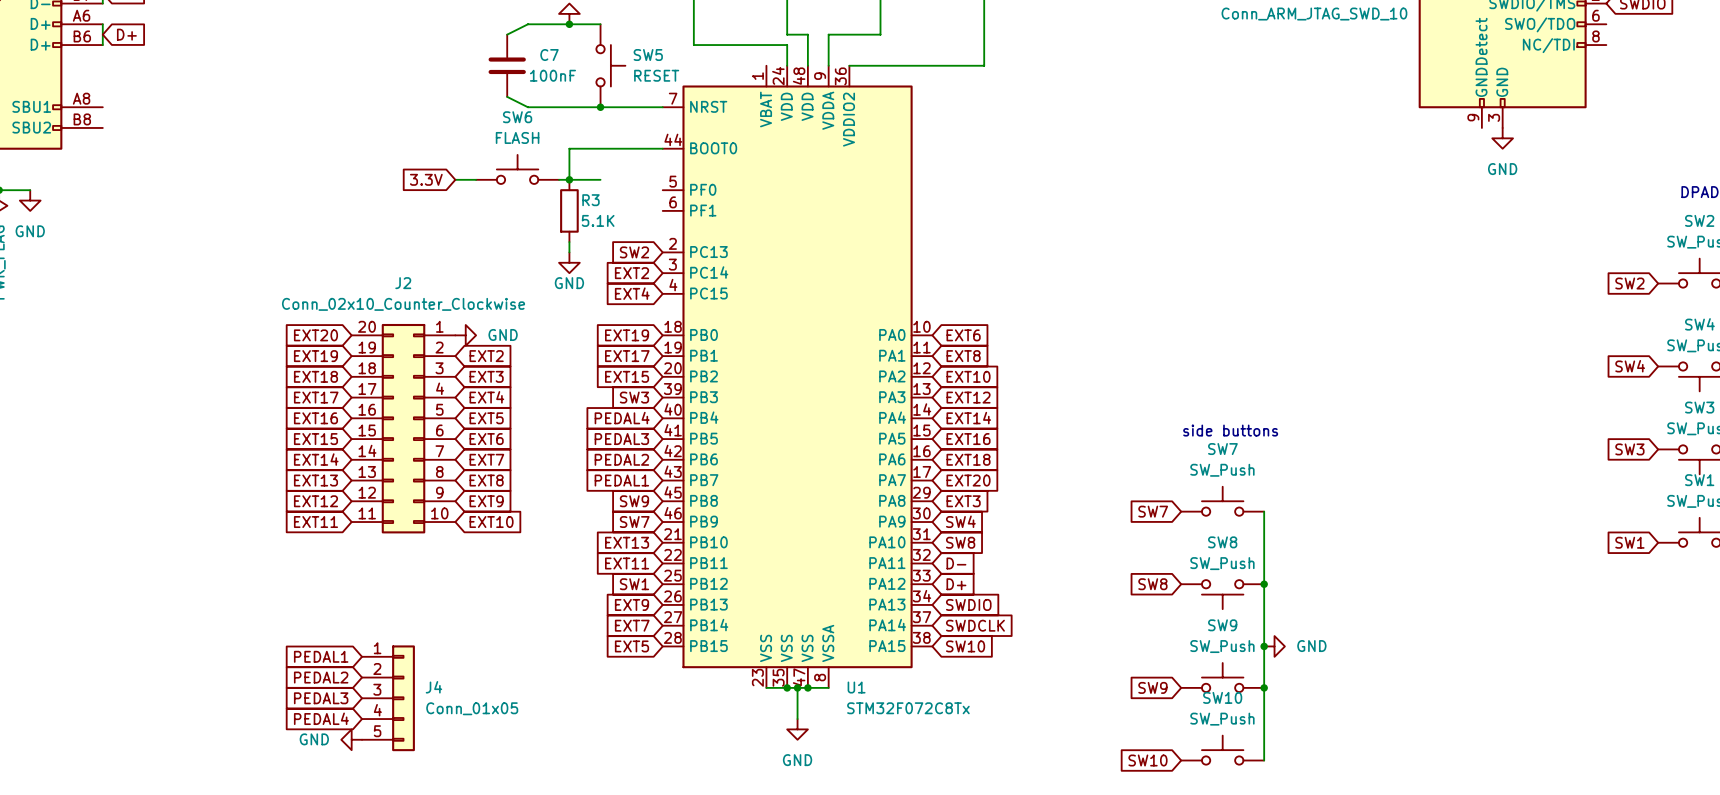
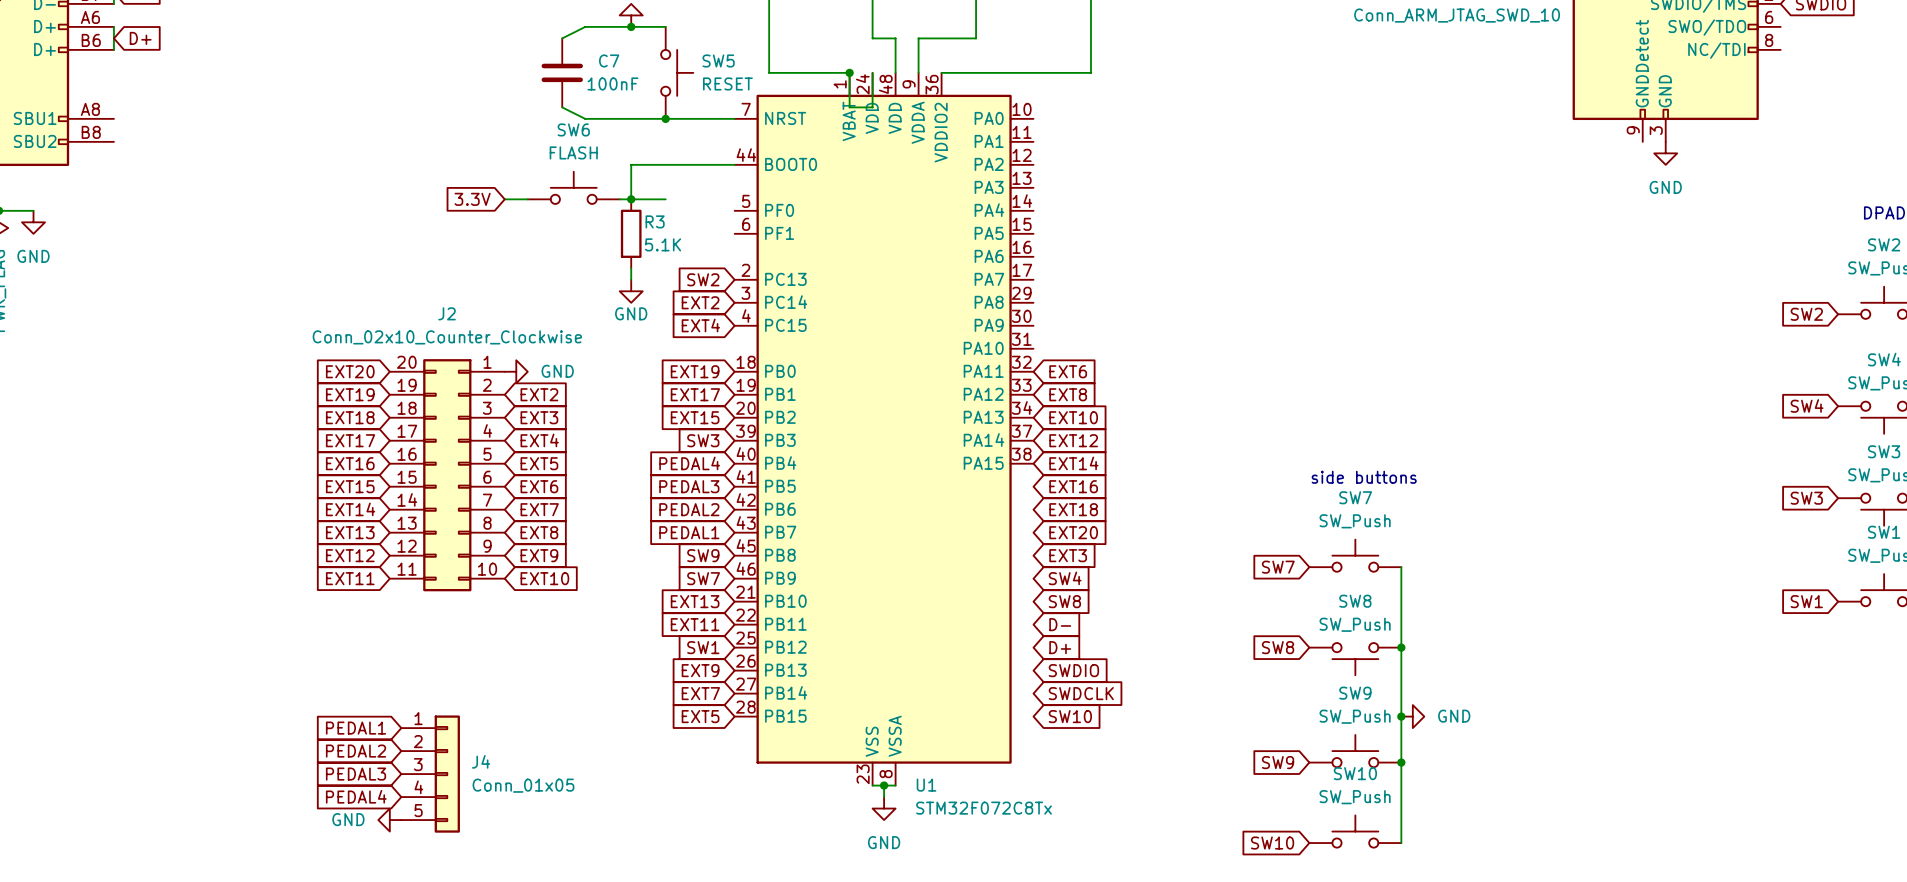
wire: (693, 45) (787, 45) (787, 65) -> (769, 49) (769, 72) (849, 72) (849, 107) (872, 107) (872, 72)
U1 symbol: [662, 65, 933, 688] -> [734, 72, 1034, 786]
junction: none -> (849, 72)
junction: (787, 687) -> none
junction: (797, 687) -> none
junction: (807, 687) -> none
U1 name position: U1 (856, 687) -> U1 (926, 785)
wire: none -> (872, 785) (895, 785)
junction: none -> (884, 785)
U1 value position: STM32F072C8Tx (908, 708) -> STM32F072C8Tx (984, 808)

